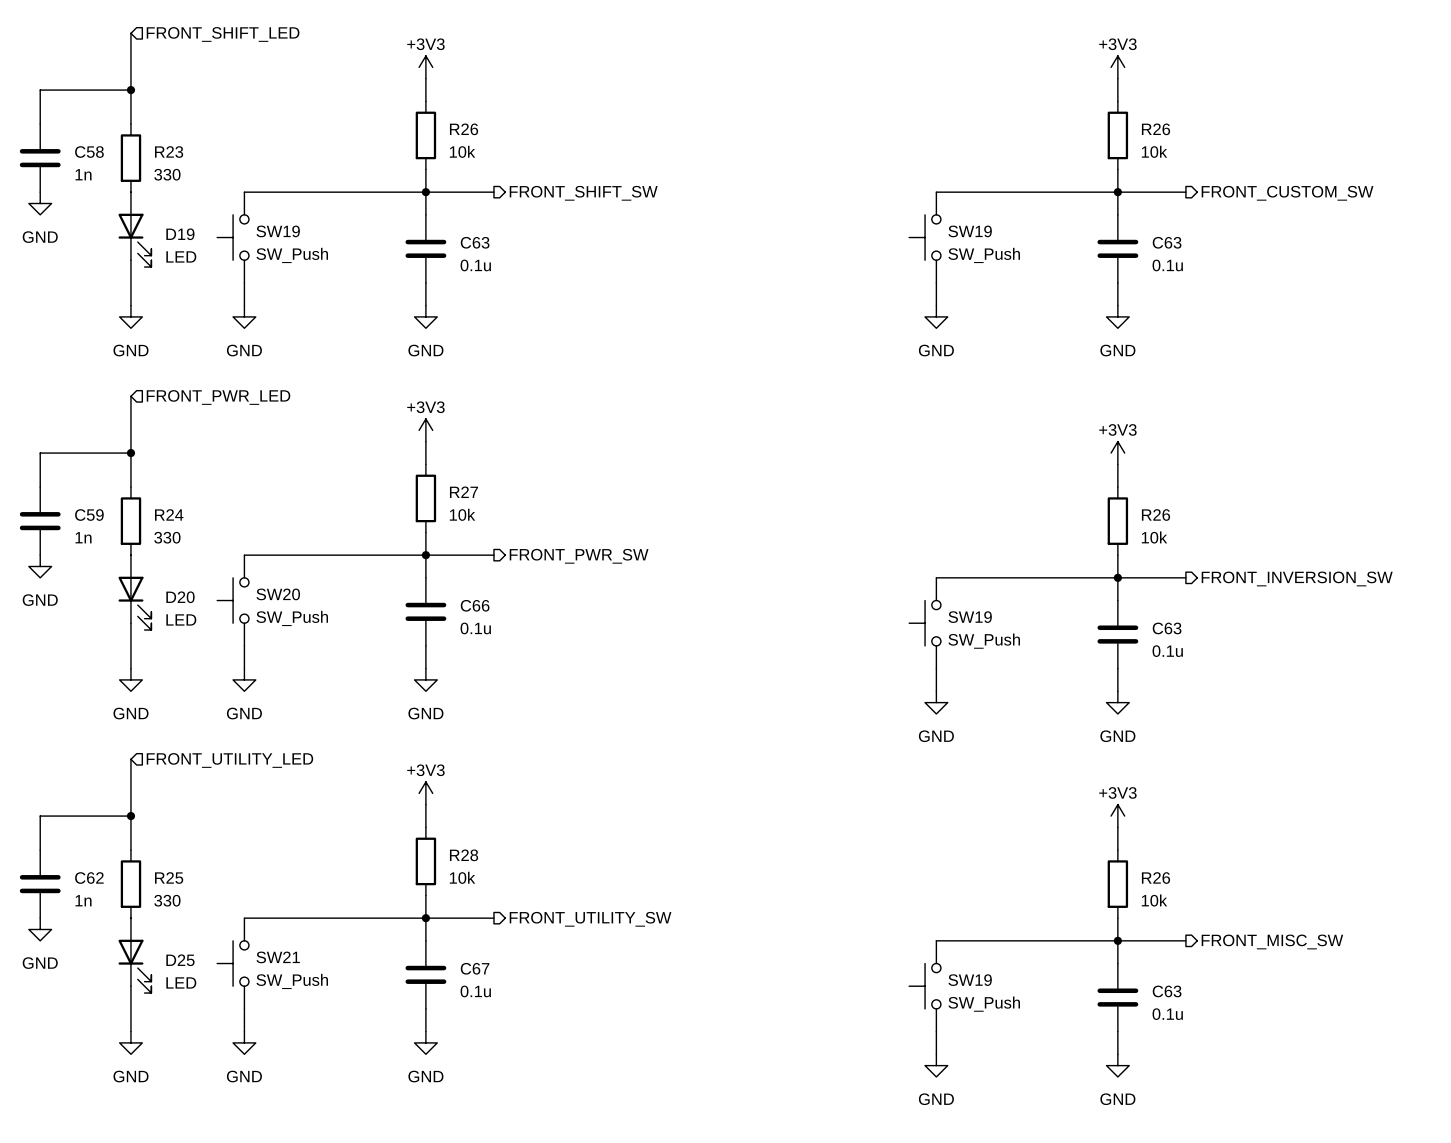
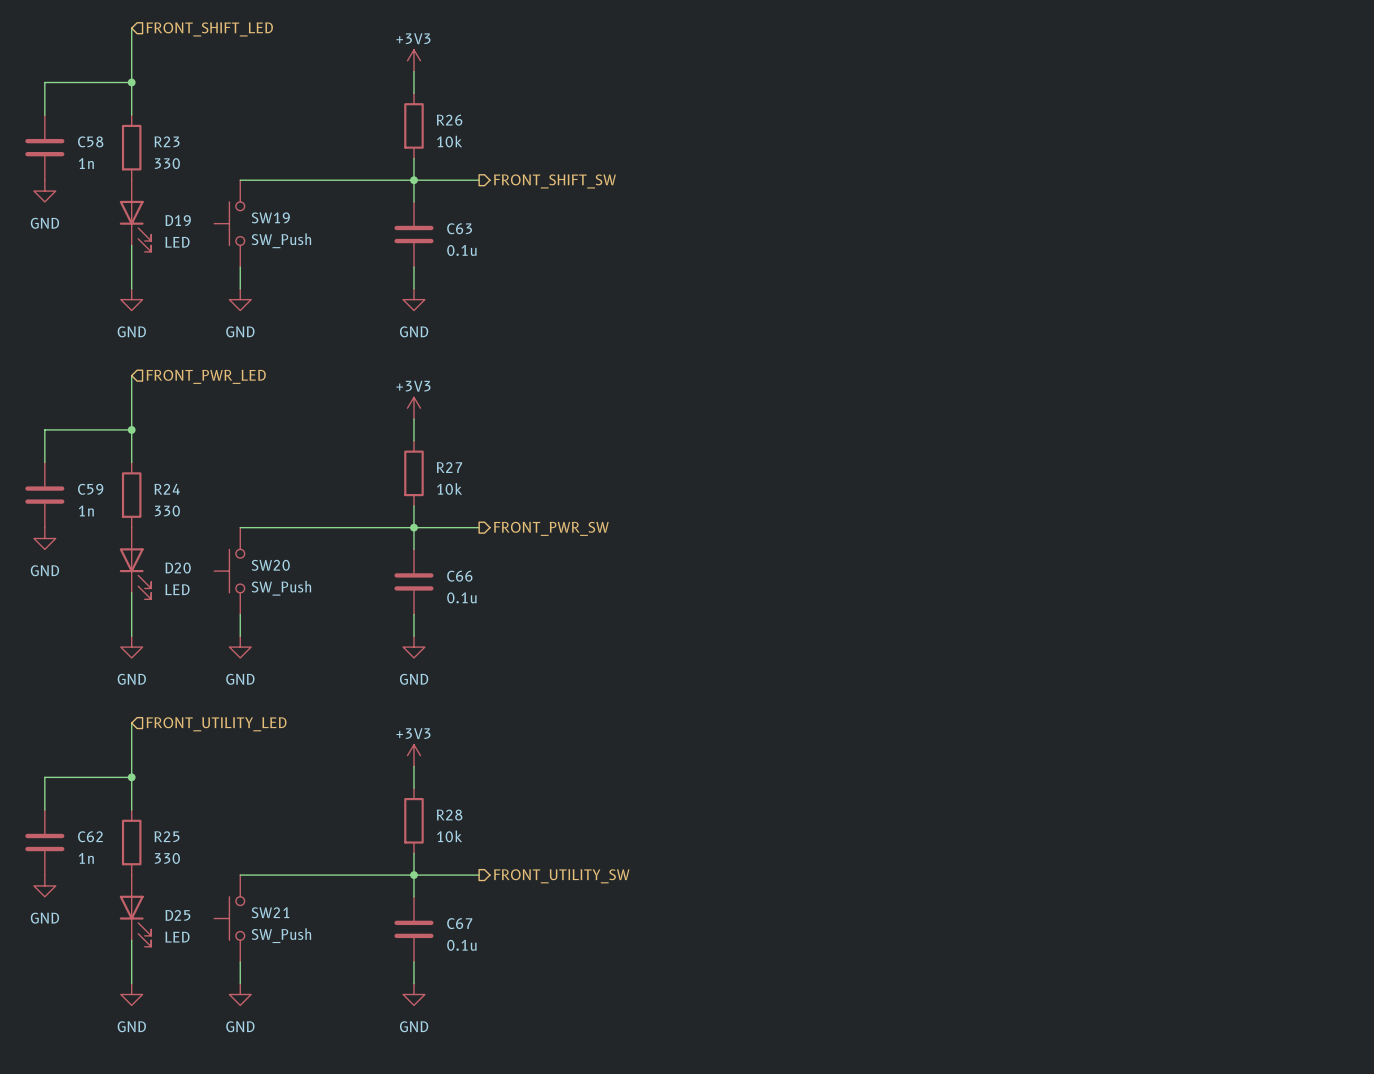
power symbol: +3V3 (1117, 67) -> none
wire: (1117, 78) (1117, 101) -> none
R26: 10k (1117, 135) -> none
wire: (1117, 169) (1117, 214) -> none
wire: (936, 192) (1185, 192) -> none
junction: (1117, 192) -> none
hierarchical label: FRONT_CUSTOM_SW (1287, 193) -> none
SW19: SW_Push (925, 237) -> none
C63: 0.1u (1117, 248) -> none
wire: (936, 282) (936, 305) -> none
wire: (1117, 282) (1117, 305) -> none
power symbol: GND (936, 316) -> none
power symbol: GND (1117, 316) -> none
power symbol: +3V3 (1117, 453) -> none
wire: (1117, 464) (1117, 487) -> none
R26: 10k (1117, 521) -> none
wire: (1117, 555) (1117, 600) -> none
wire: (936, 577) (1185, 577) -> none
junction: (1117, 577) -> none
hierarchical label: FRONT_INVERSION_SW (1297, 578) -> none
SW19: SW_Push (925, 623) -> none
C63: 0.1u (1117, 634) -> none
wire: (936, 668) (936, 691) -> none
wire: (1117, 668) (1117, 691) -> none
power symbol: GND (936, 702) -> none
power symbol: GND (1117, 702) -> none
power symbol: +3V3 (1117, 816) -> none
wire: (1117, 827) (1117, 850) -> none
R26: 10k (1117, 884) -> none
wire: (1117, 918) (1117, 963) -> none
wire: (936, 940) (1185, 940) -> none
junction: (1117, 940) -> none
hierarchical label: FRONT_MISC_SW (1272, 941) -> none
SW19: SW_Push (925, 986) -> none
C63: 0.1u (1117, 997) -> none
wire: (936, 1031) (936, 1054) -> none
wire: (1117, 1031) (1117, 1054) -> none
power symbol: GND (936, 1065) -> none
power symbol: GND (1117, 1065) -> none

